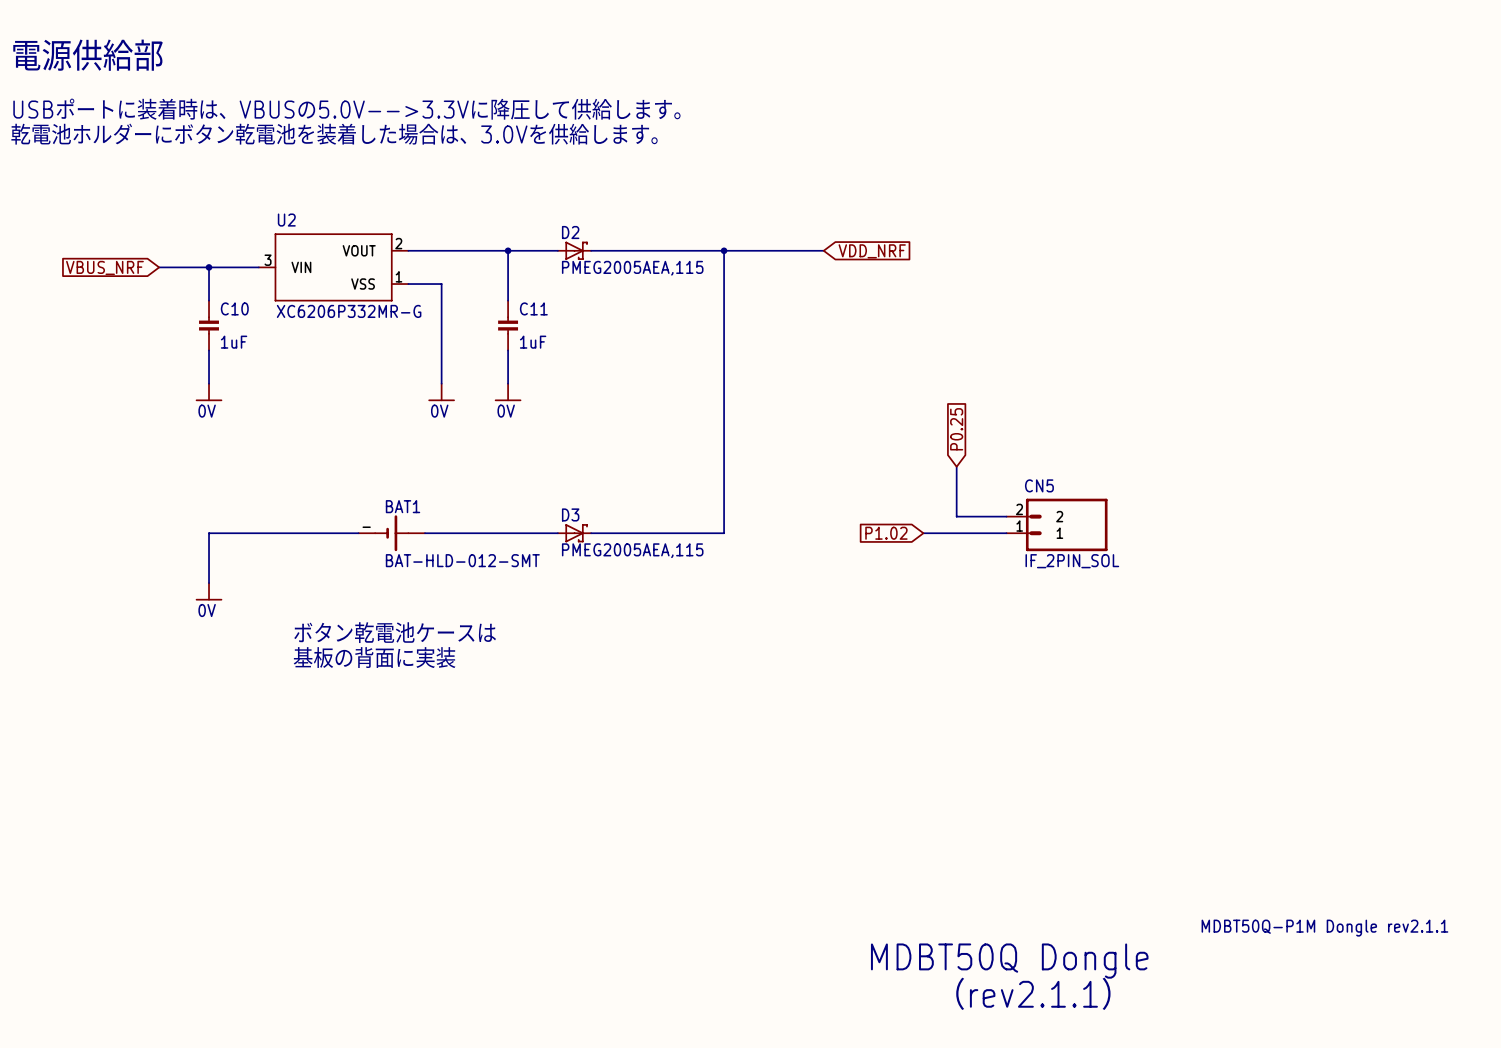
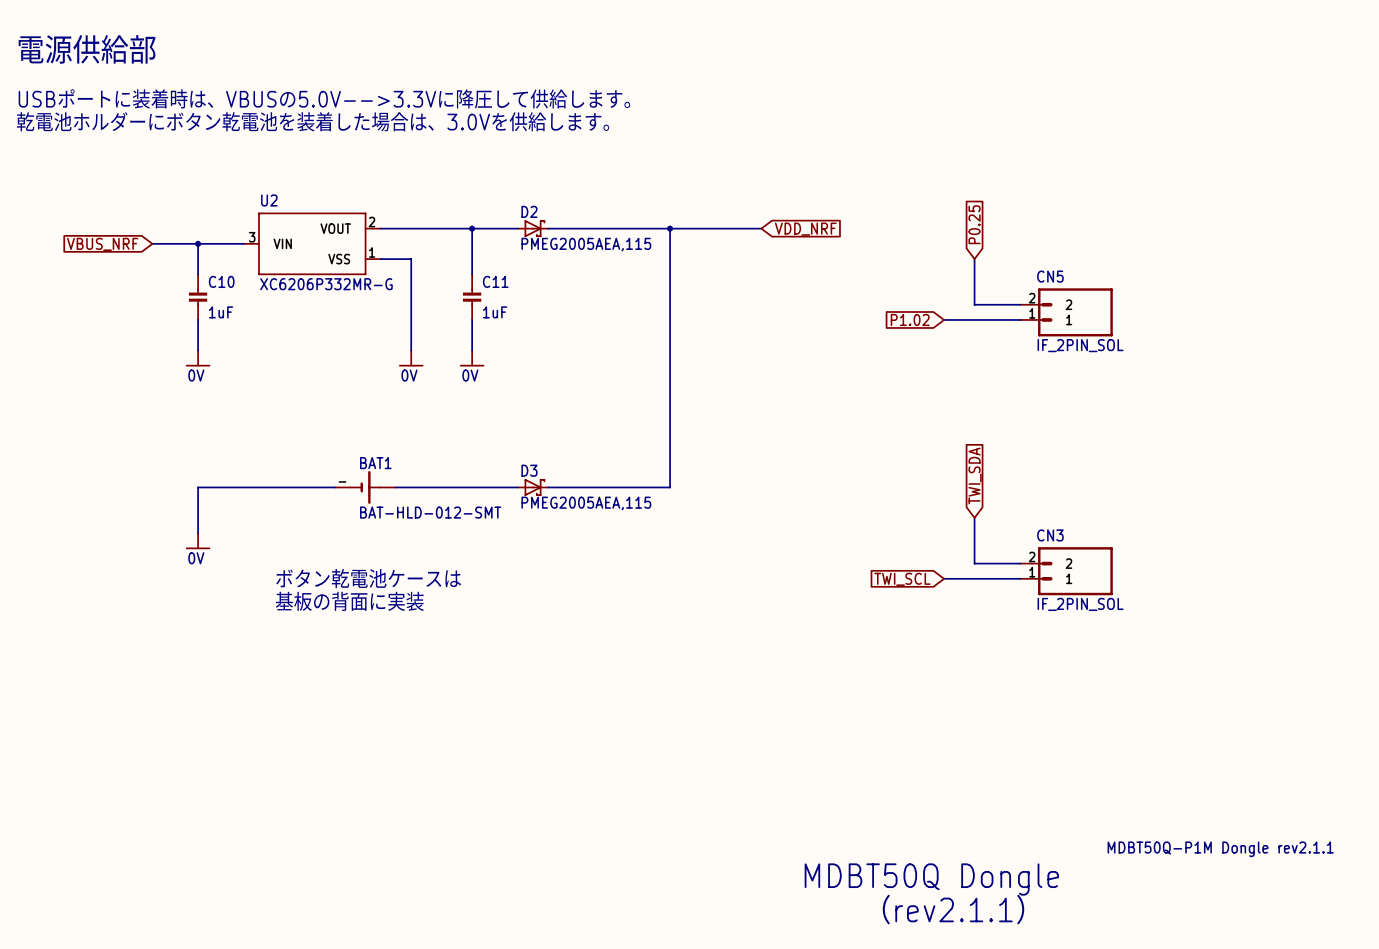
global label: none -> P0.25 (974, 224)
wire: none -> (974, 259) (974, 304) (1020, 304)
global label: none -> P1.02 (910, 319)
wire: none -> (944, 319) (1020, 319)
global label: P0.25 (956, 429) -> none
wire: (956, 466) (956, 516) (1006, 516) -> (974, 517) (974, 563) (1020, 563)
global label: none -> TWI_SDA (975, 476)
CN5 position: (1057, 524) -> (1066, 312)
global label: P1.02 (886, 533) -> none
wire: (923, 533) (1006, 533) -> (944, 578) (1020, 578)
CN3: none -> IF_2PIN_SOL (1066, 571)
global label: none -> TWI_SCL (902, 579)

